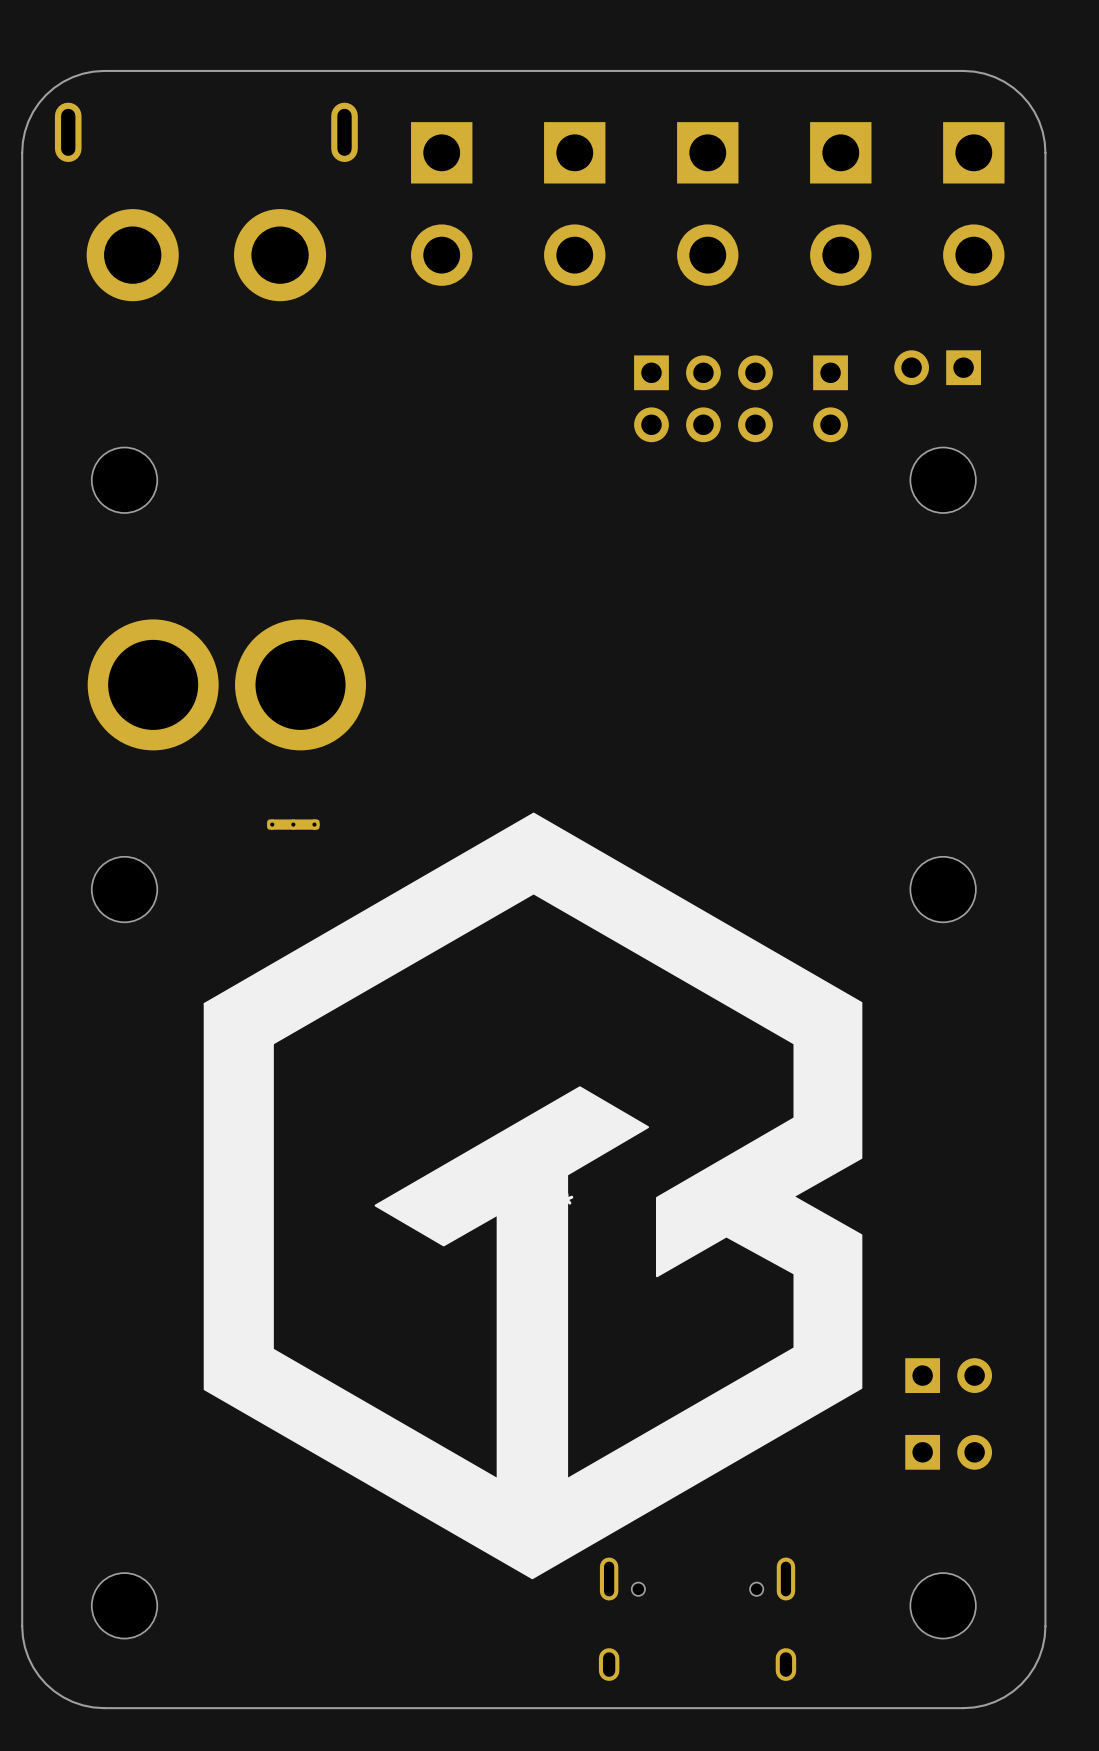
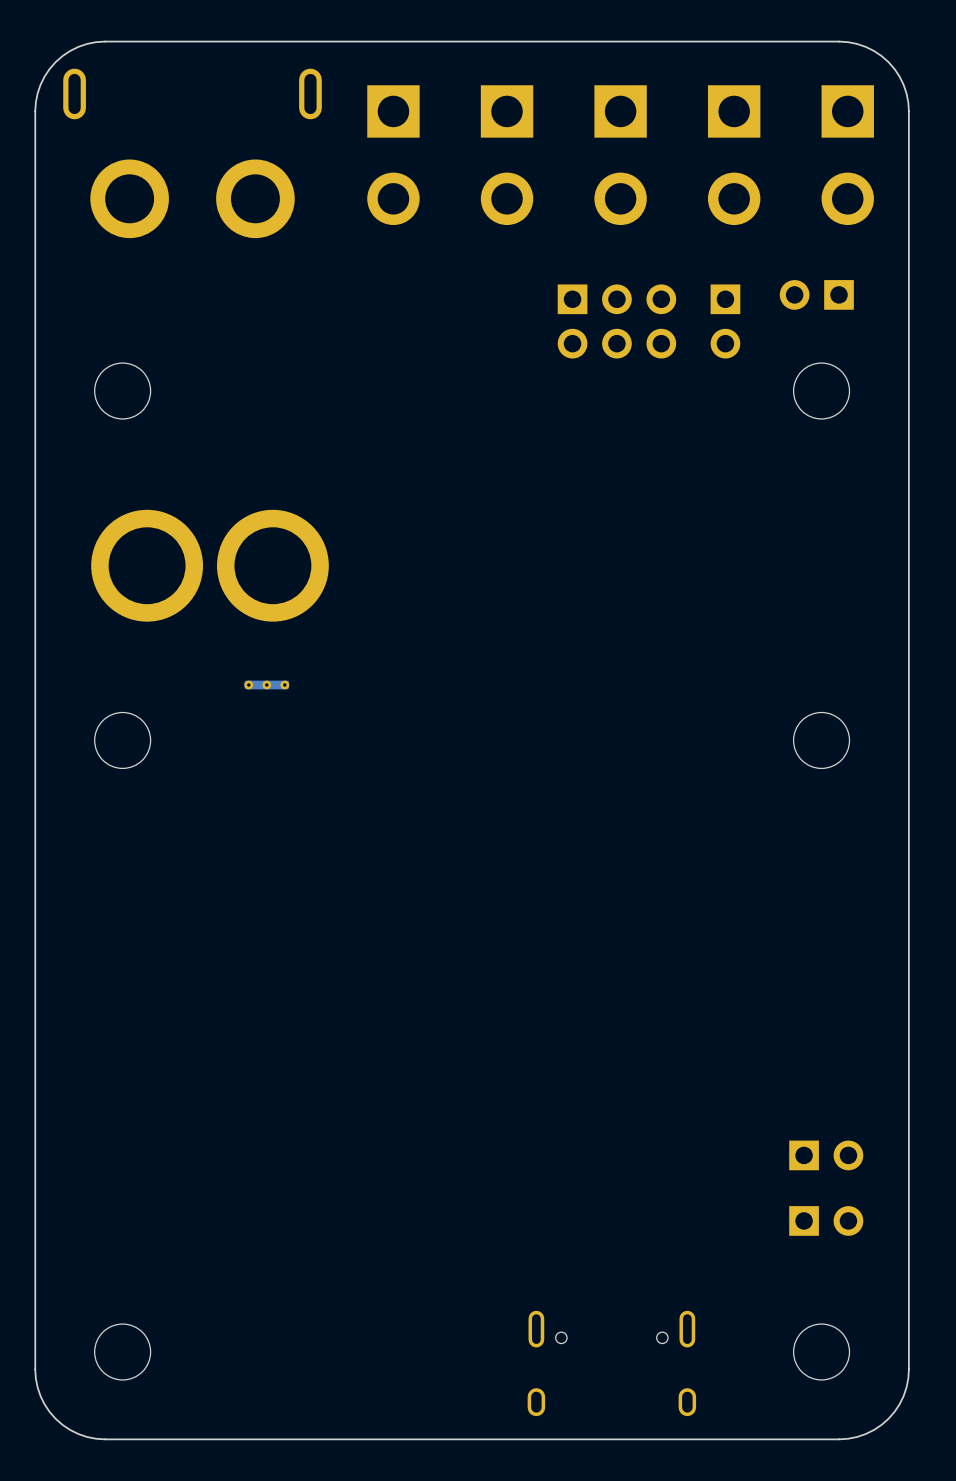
part: (533, 1195) -> none

